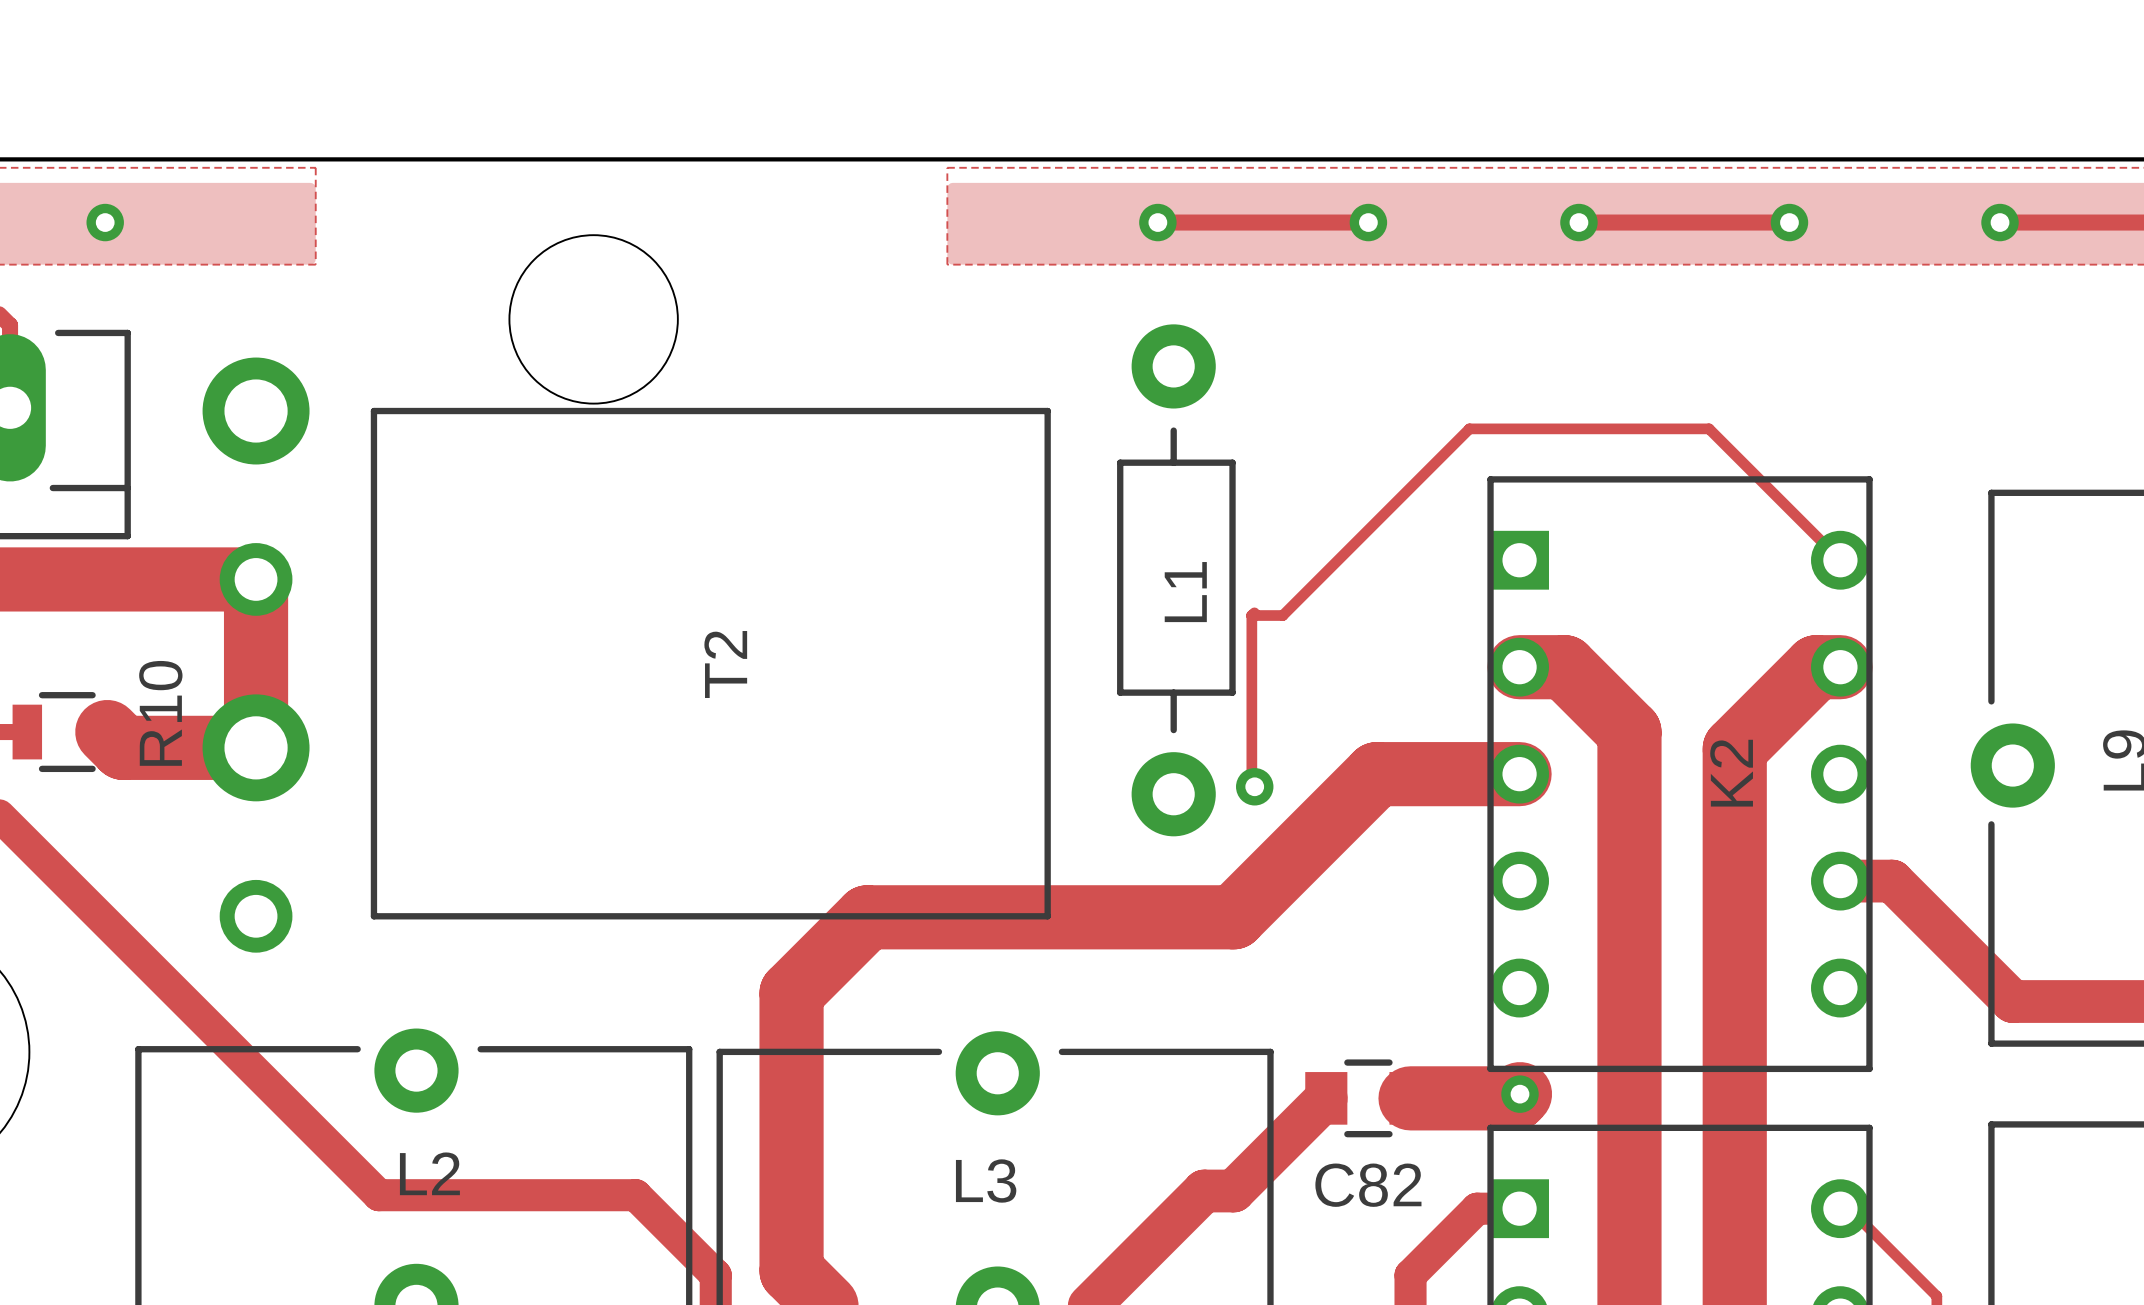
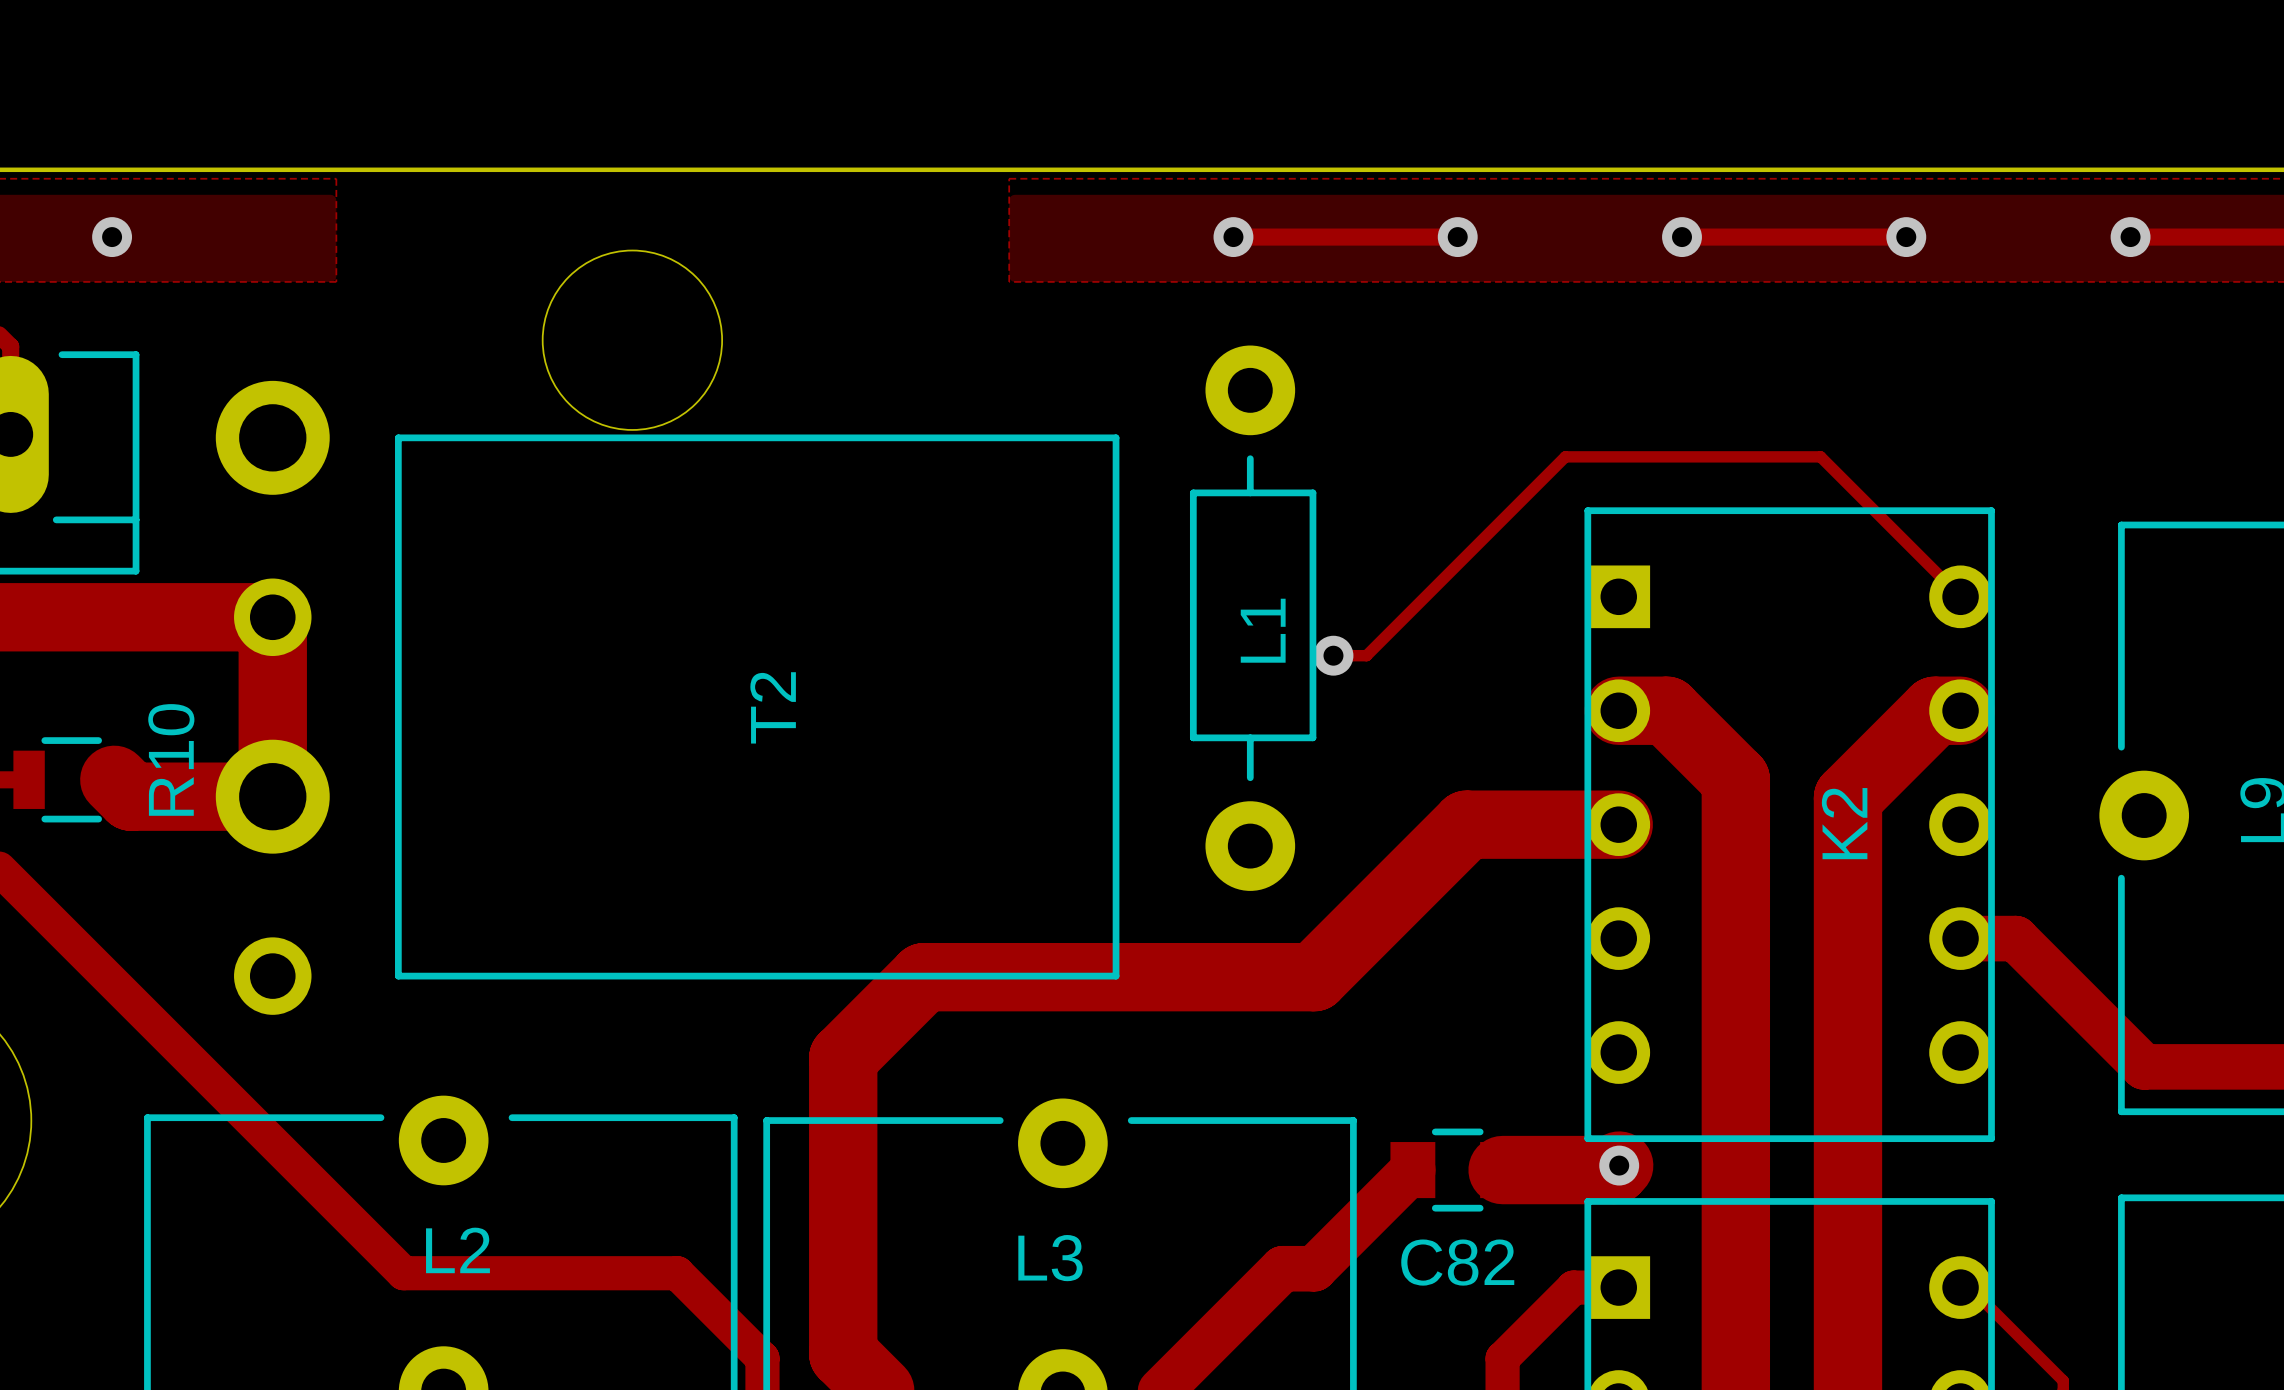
track: (1251, 615) (1251, 783) (1254, 786) -> none
via position: (1254, 786) -> (1333, 655)

